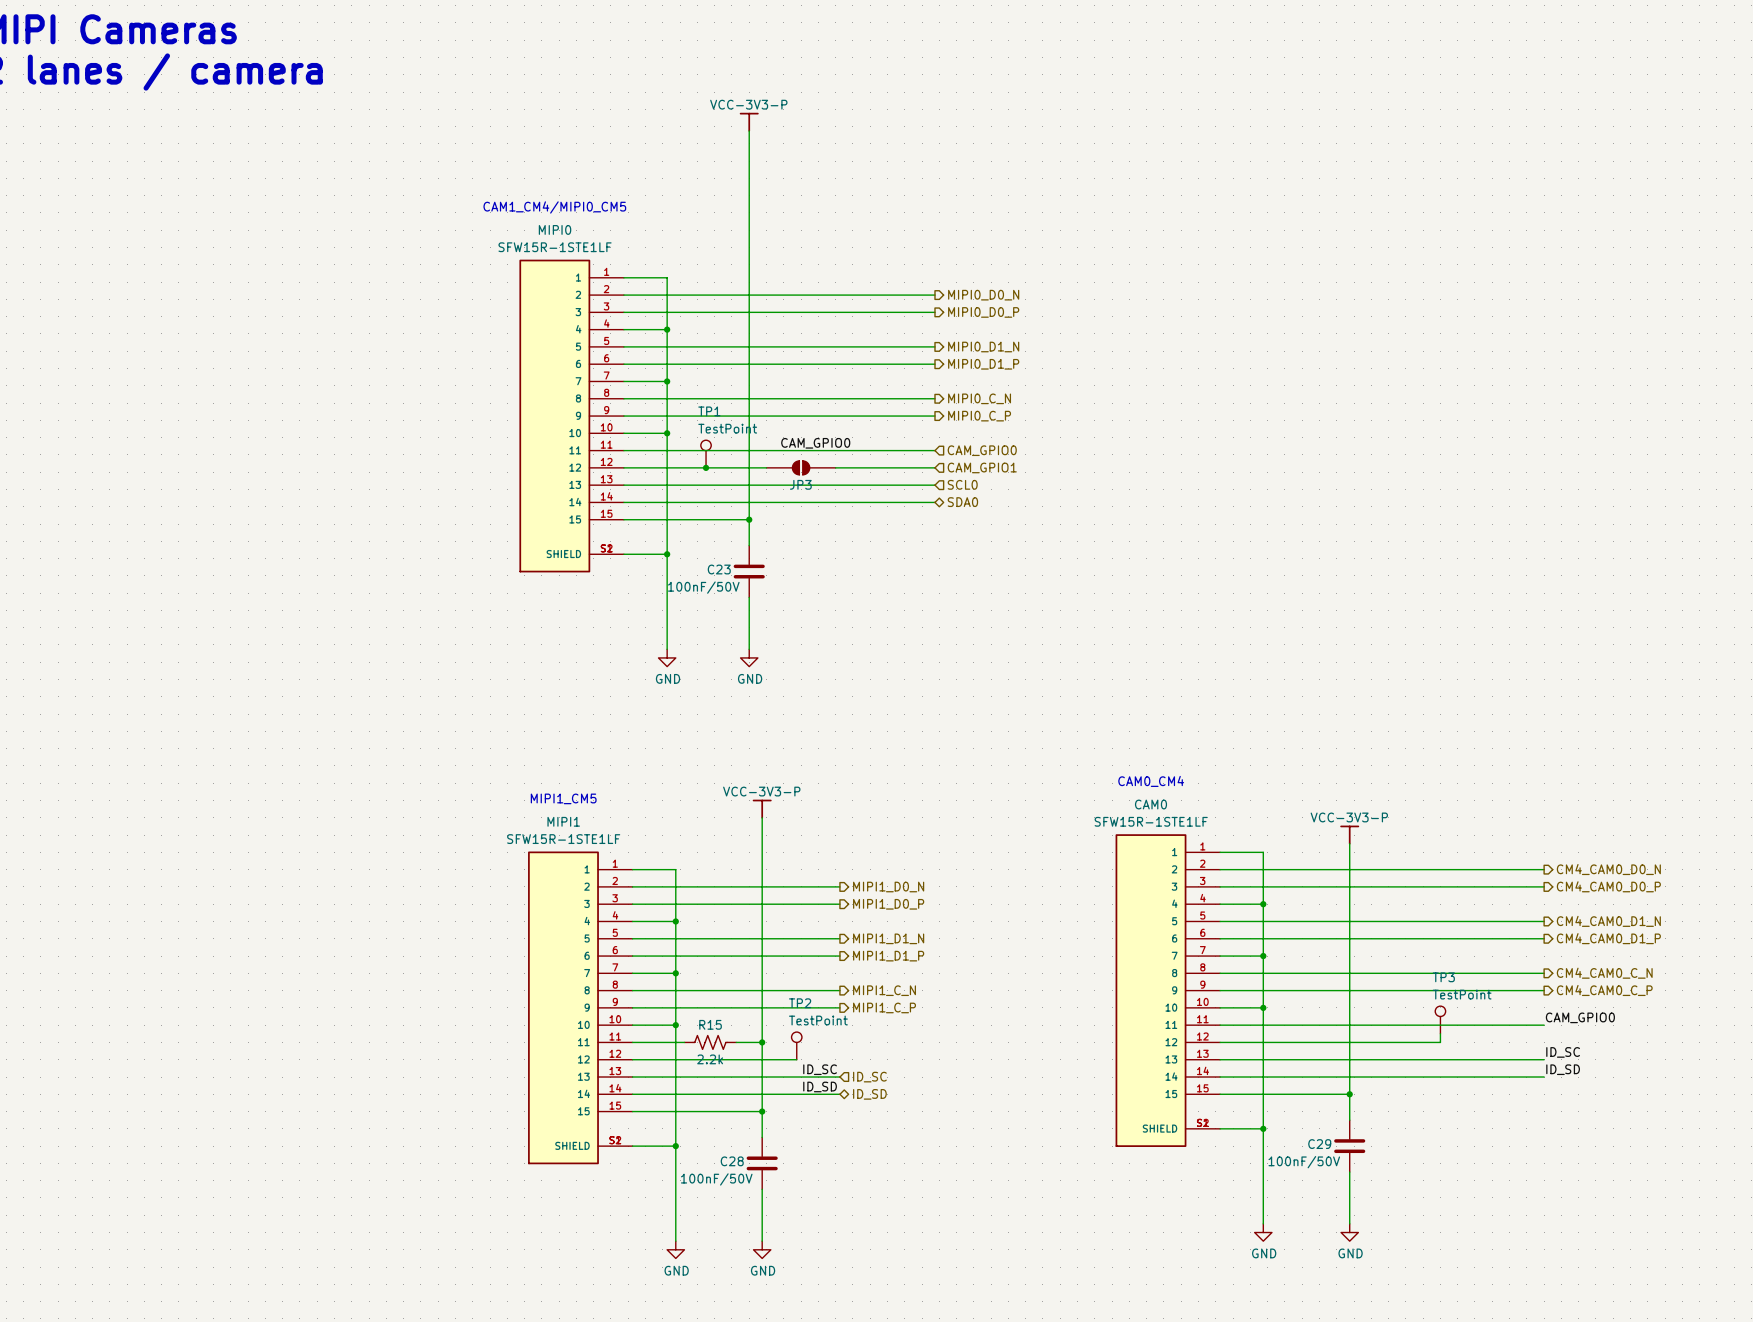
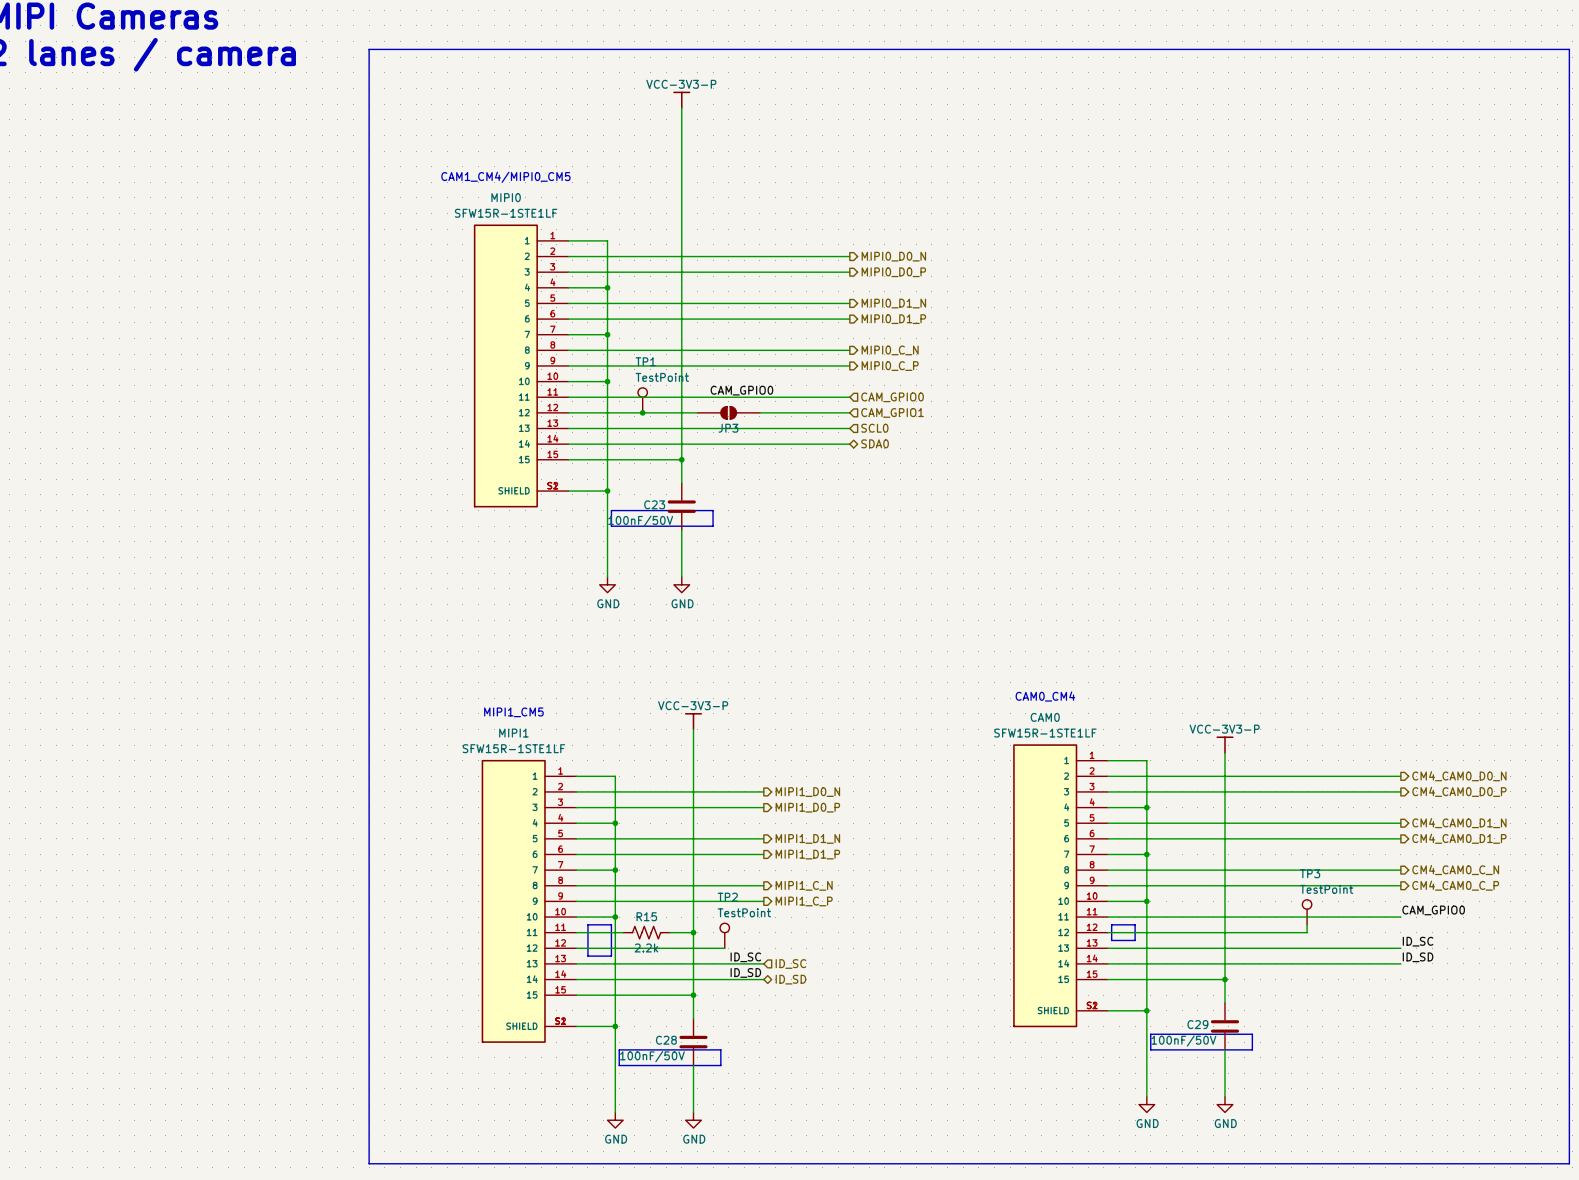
line: none -> (369, 49) (1569, 49) (1569, 1163) (369, 1163) (369, 49)
line: none -> (611, 510) (611, 526) (713, 526) (713, 510) (611, 510)
line: none -> (587, 924) (611, 924) (611, 956) (587, 956) (587, 924)
line: none -> (1111, 924) (1135, 924) (1135, 940) (1111, 940) (1111, 924)
line: none -> (1150, 1034) (1252, 1034) (1252, 1049) (1150, 1049) (1150, 1034)
line: none -> (619, 1049) (720, 1049) (720, 1065) (619, 1065) (619, 1049)

